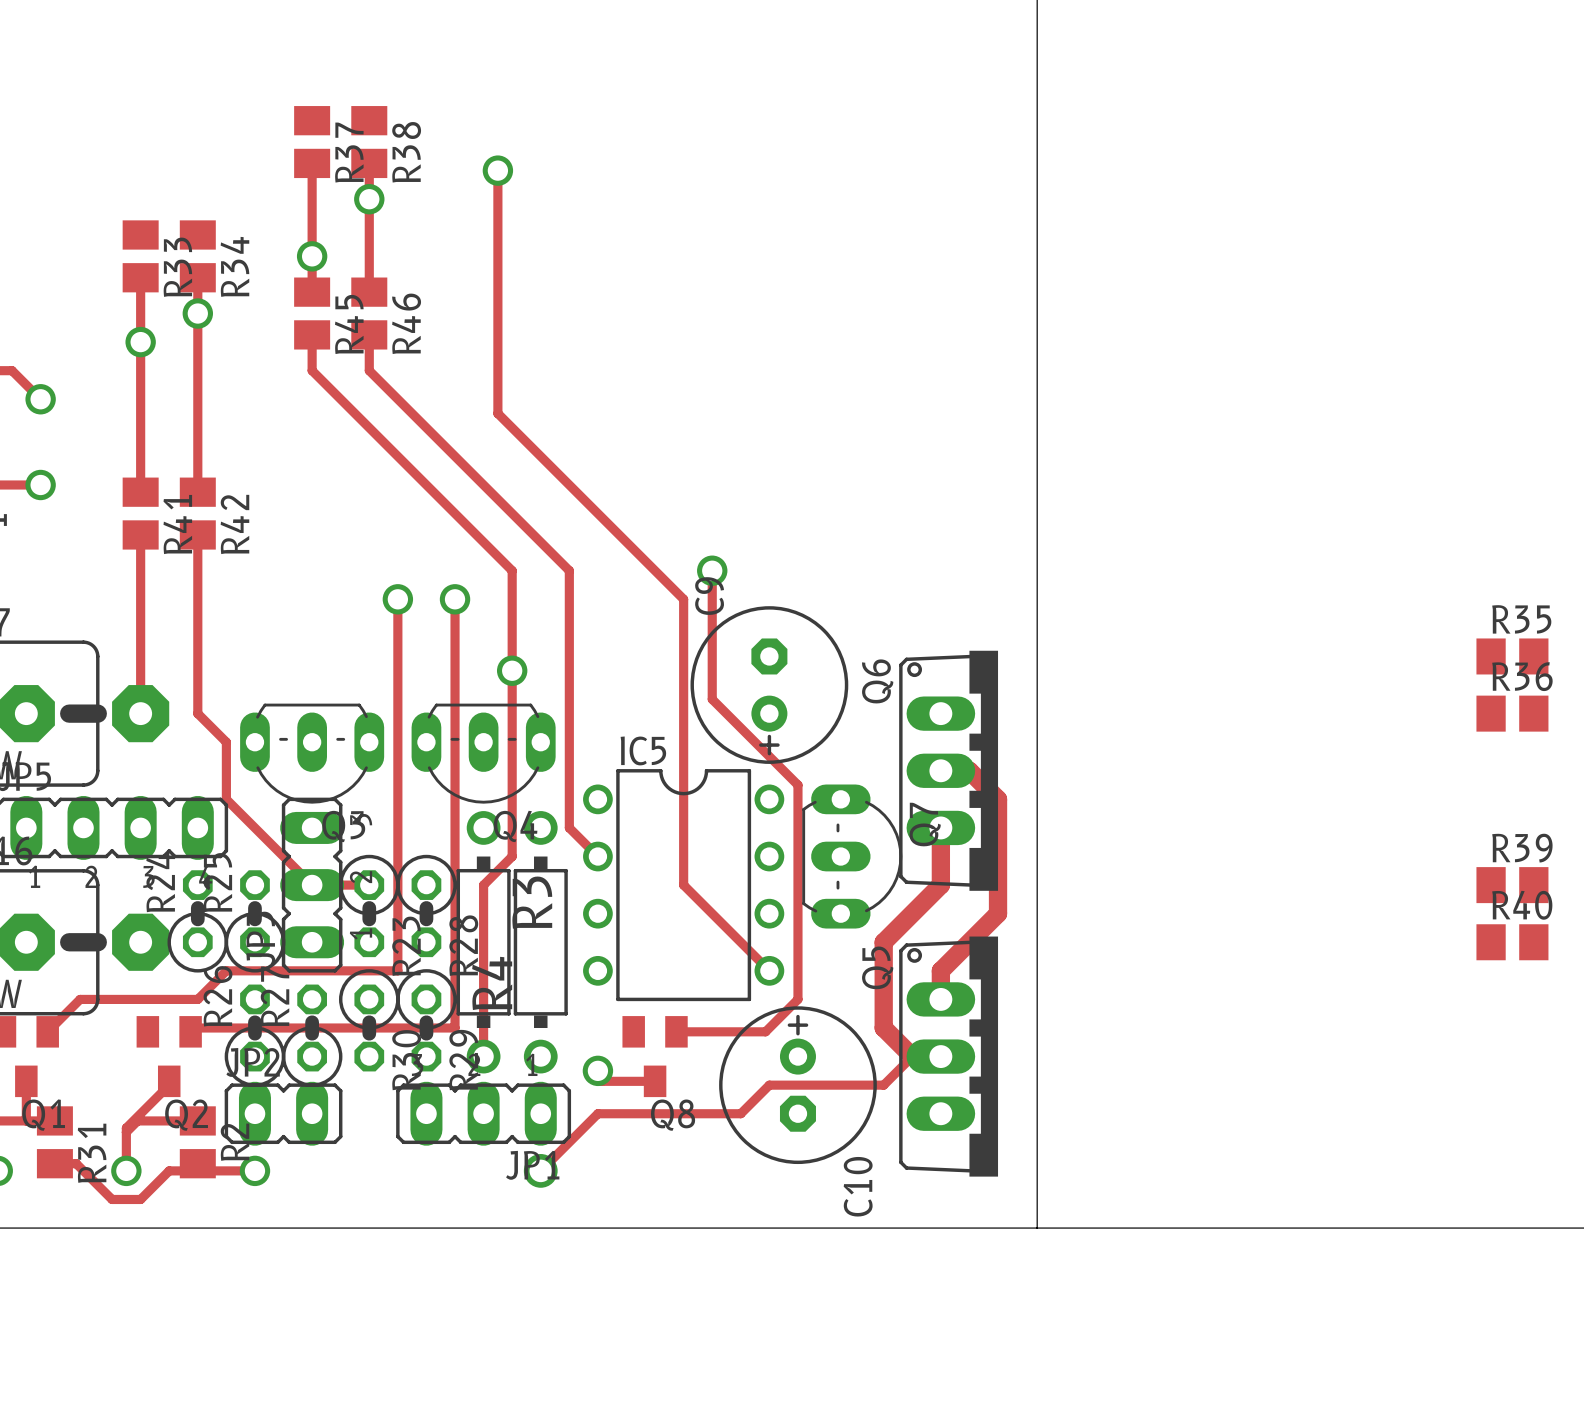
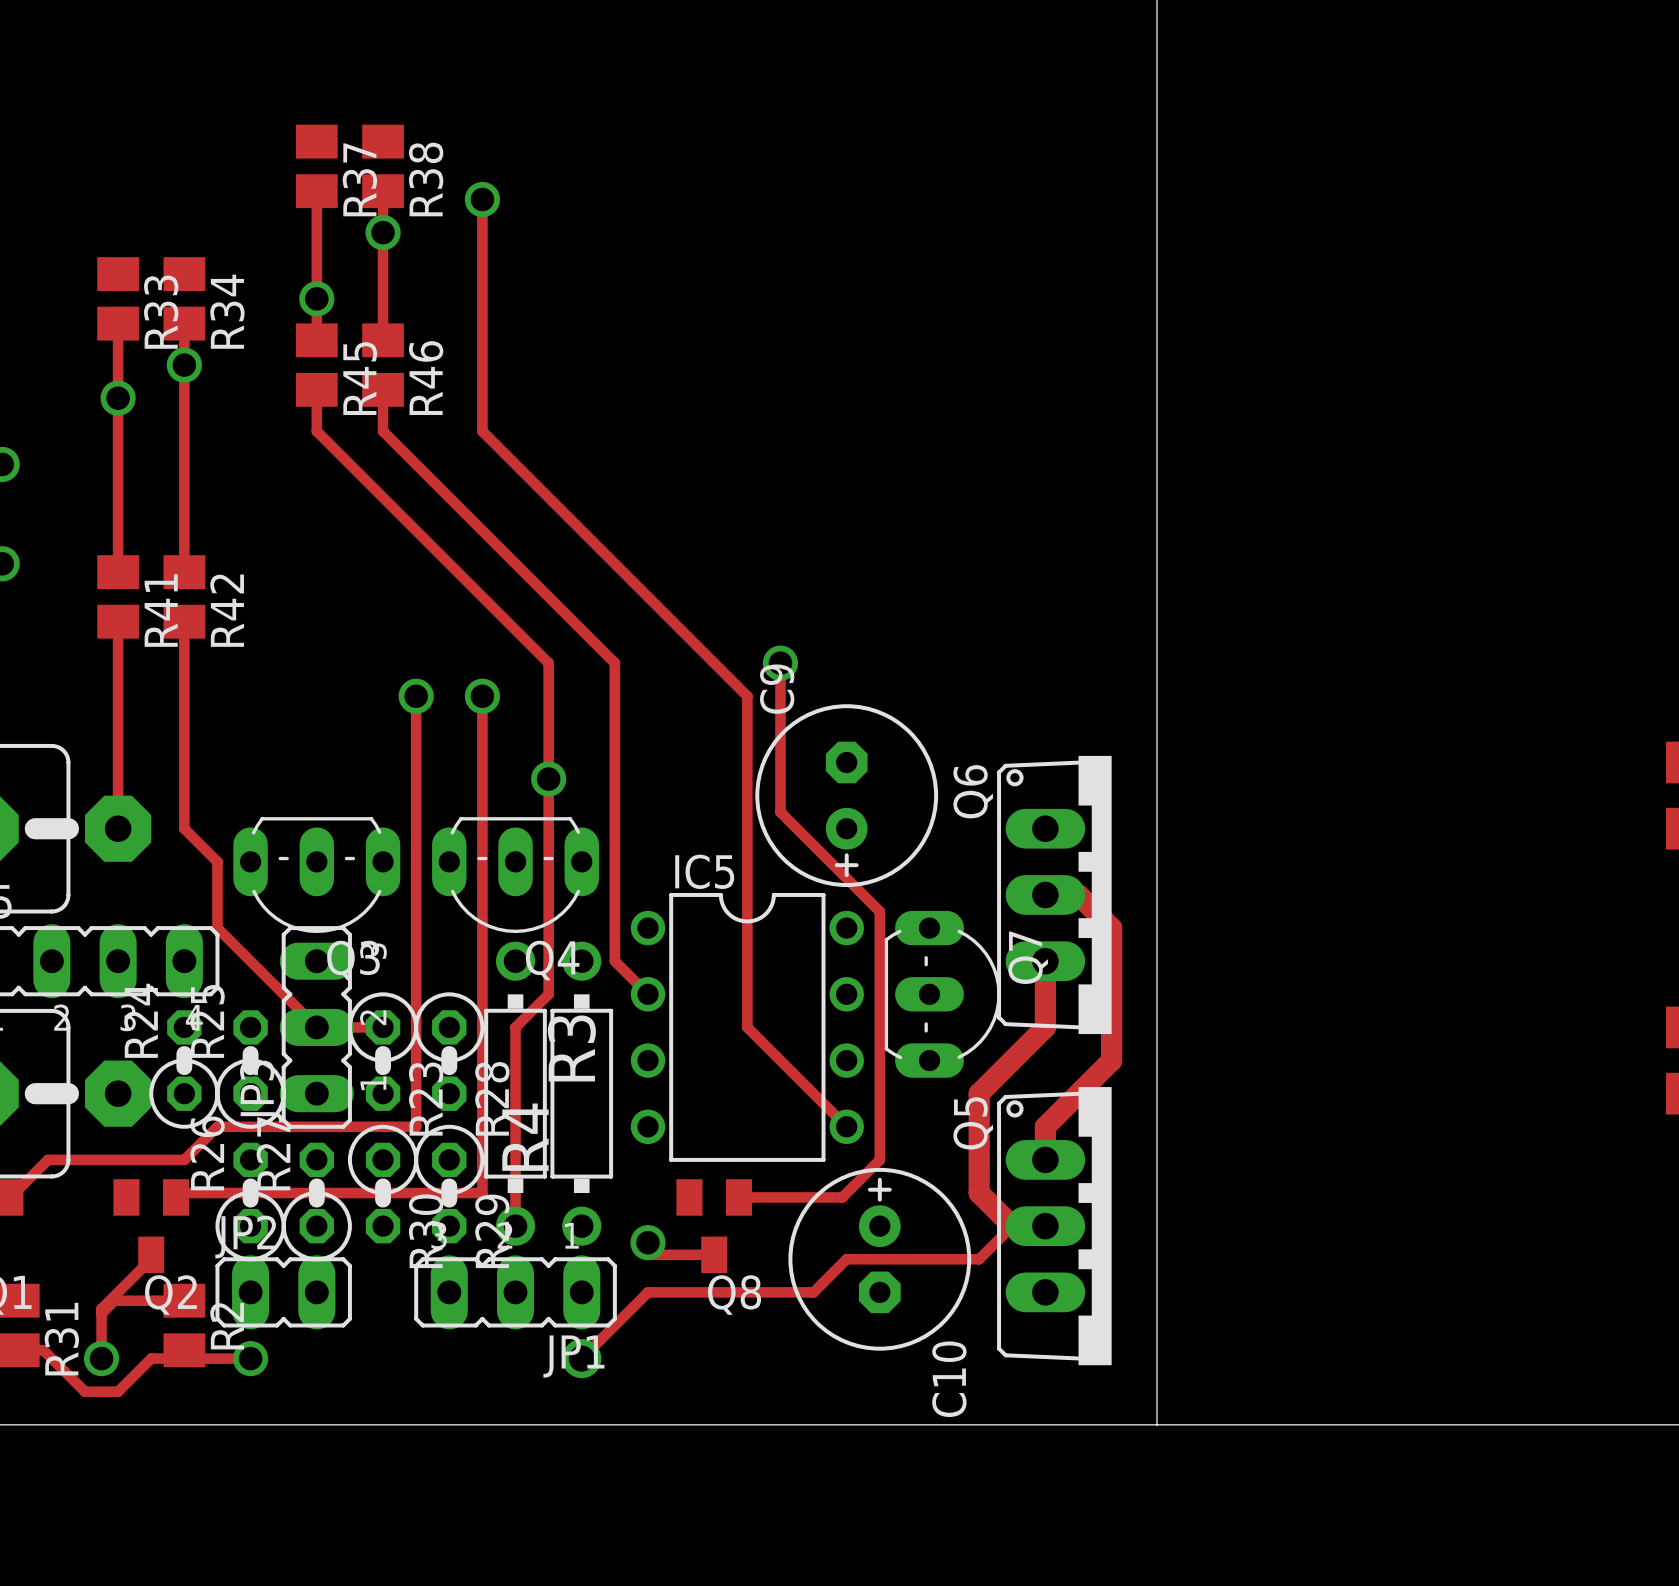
track: (497, 170) (497, 413) -> (482, 199) (482, 431) (532, 481)
via position: (497, 170) -> (482, 199)

